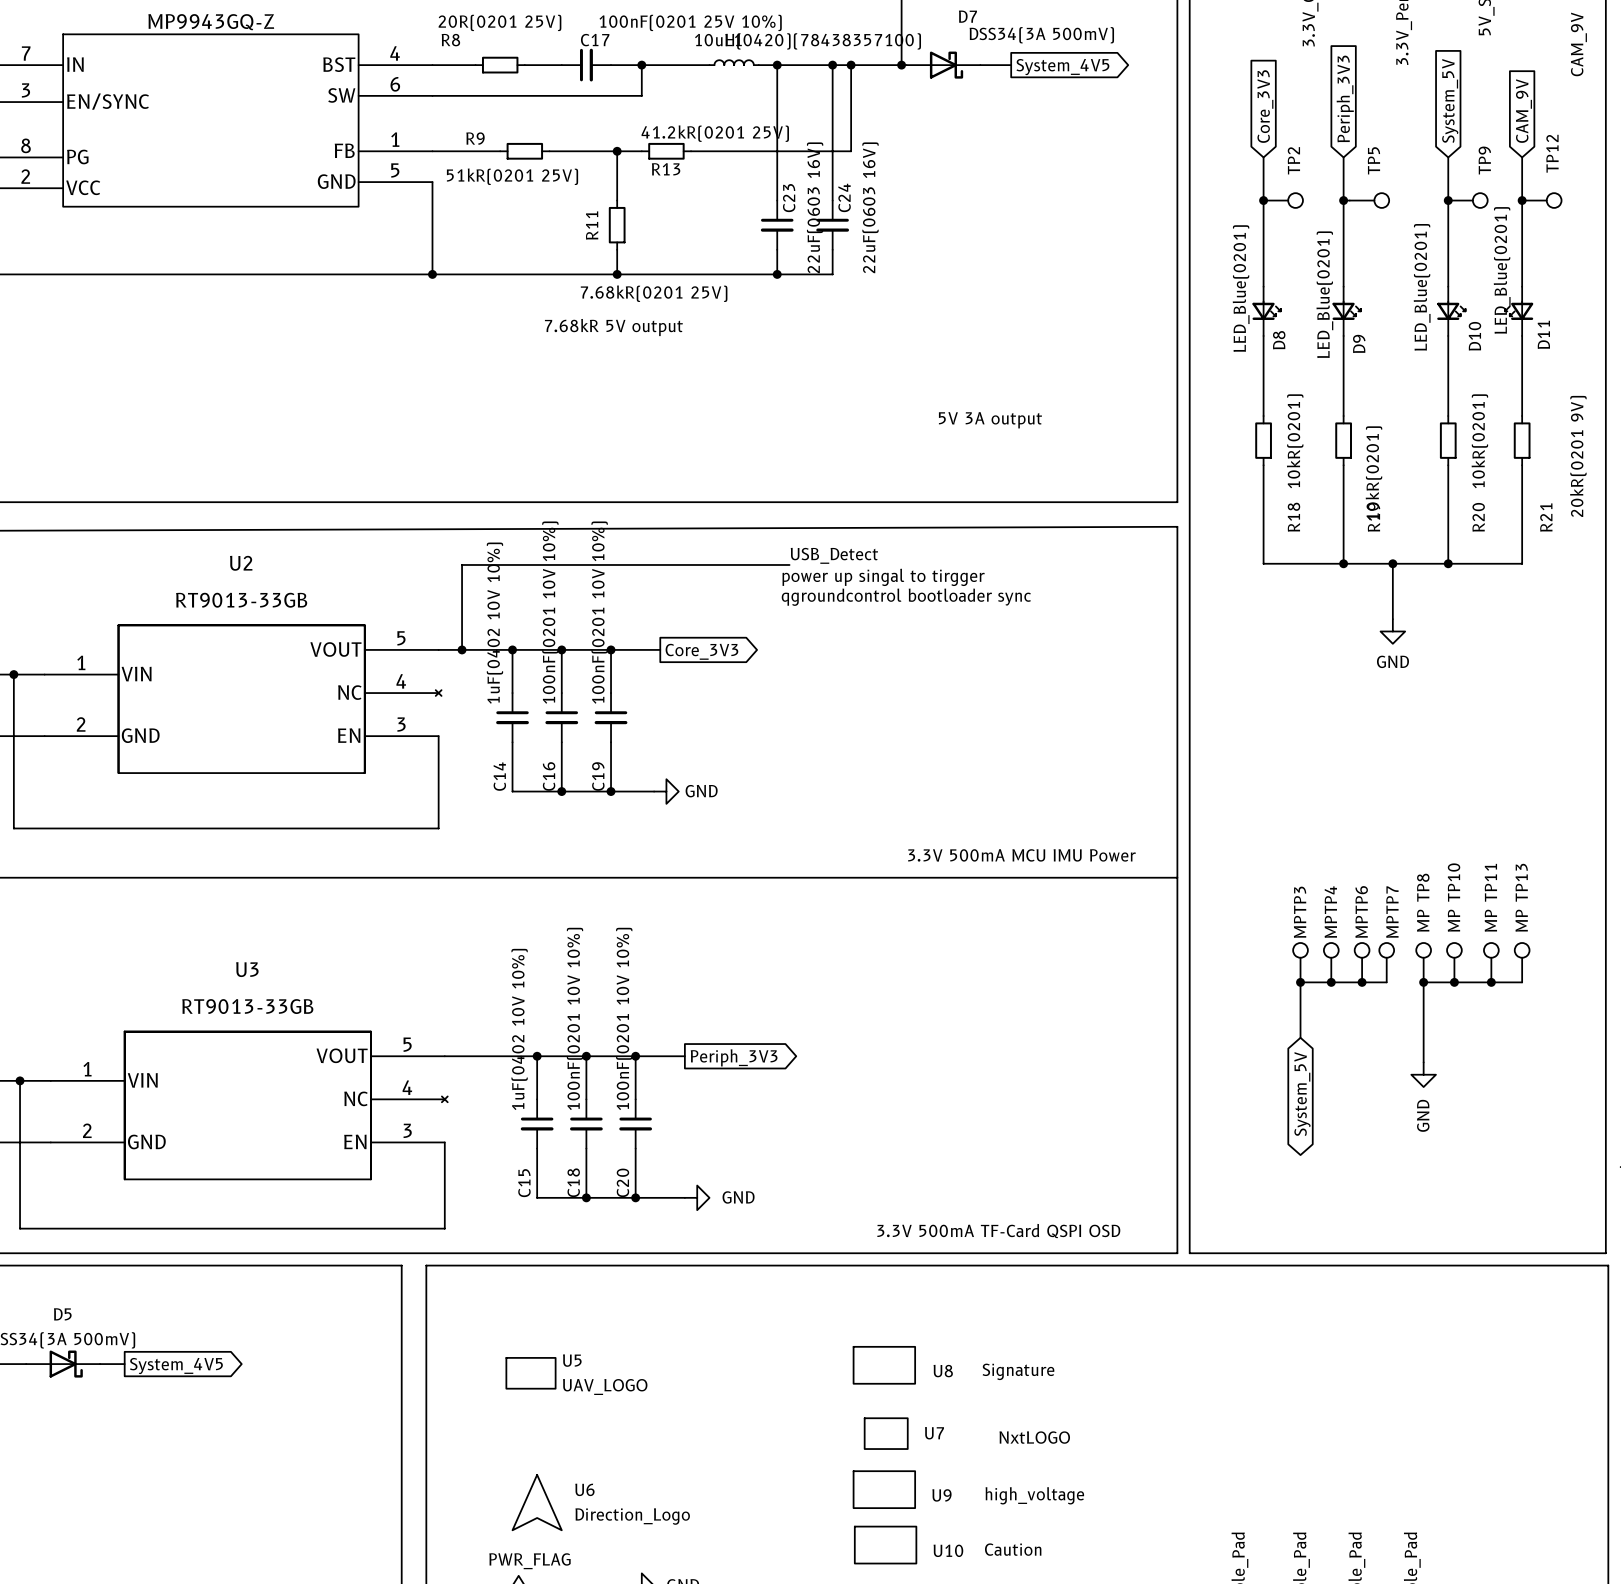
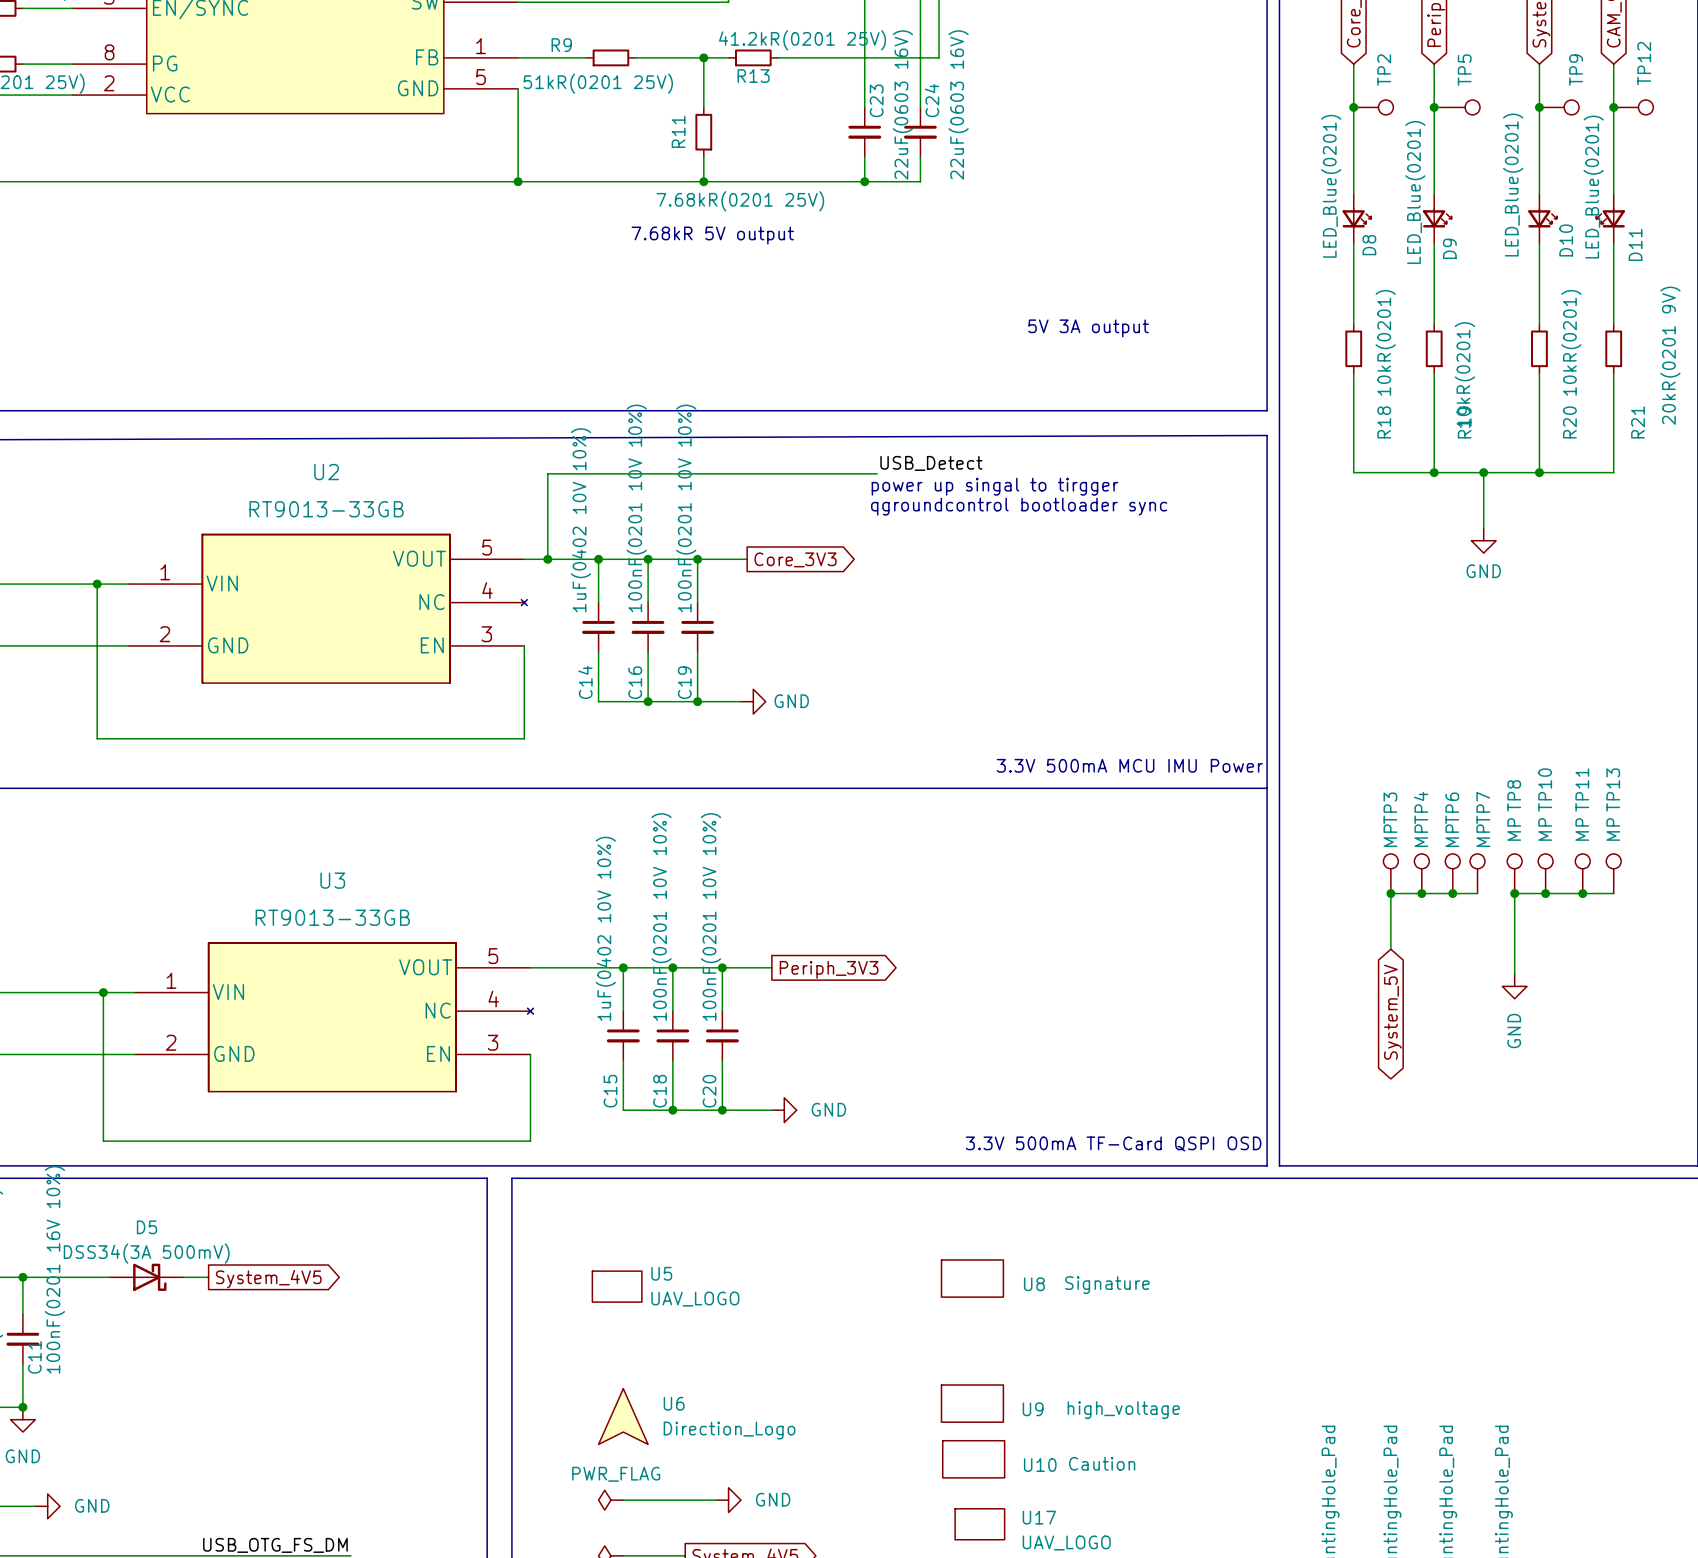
U7: NxtLOGO (886, 1433) -> none

